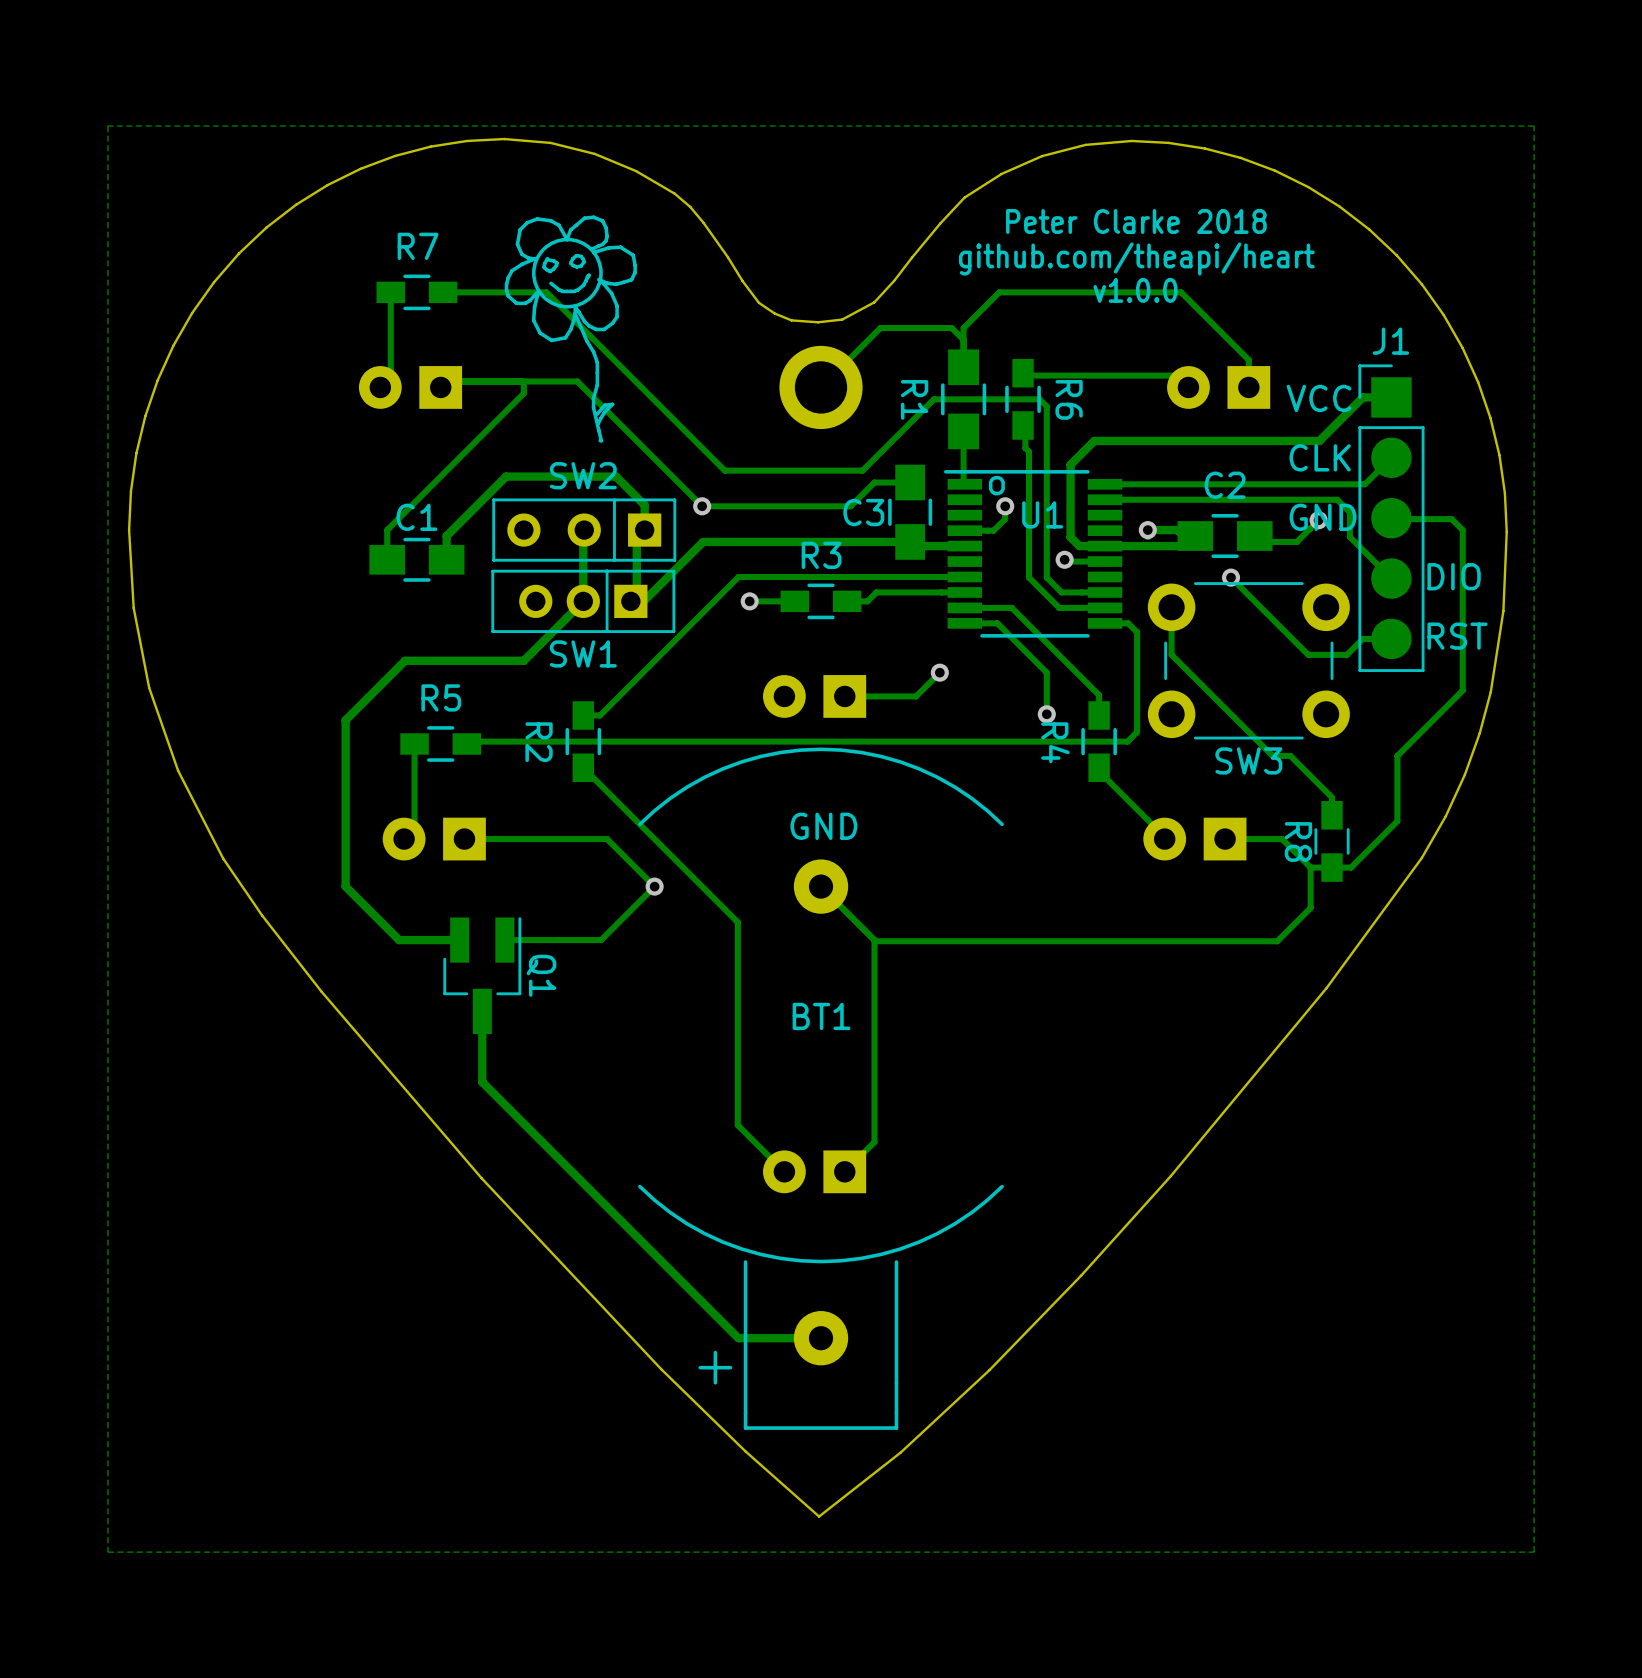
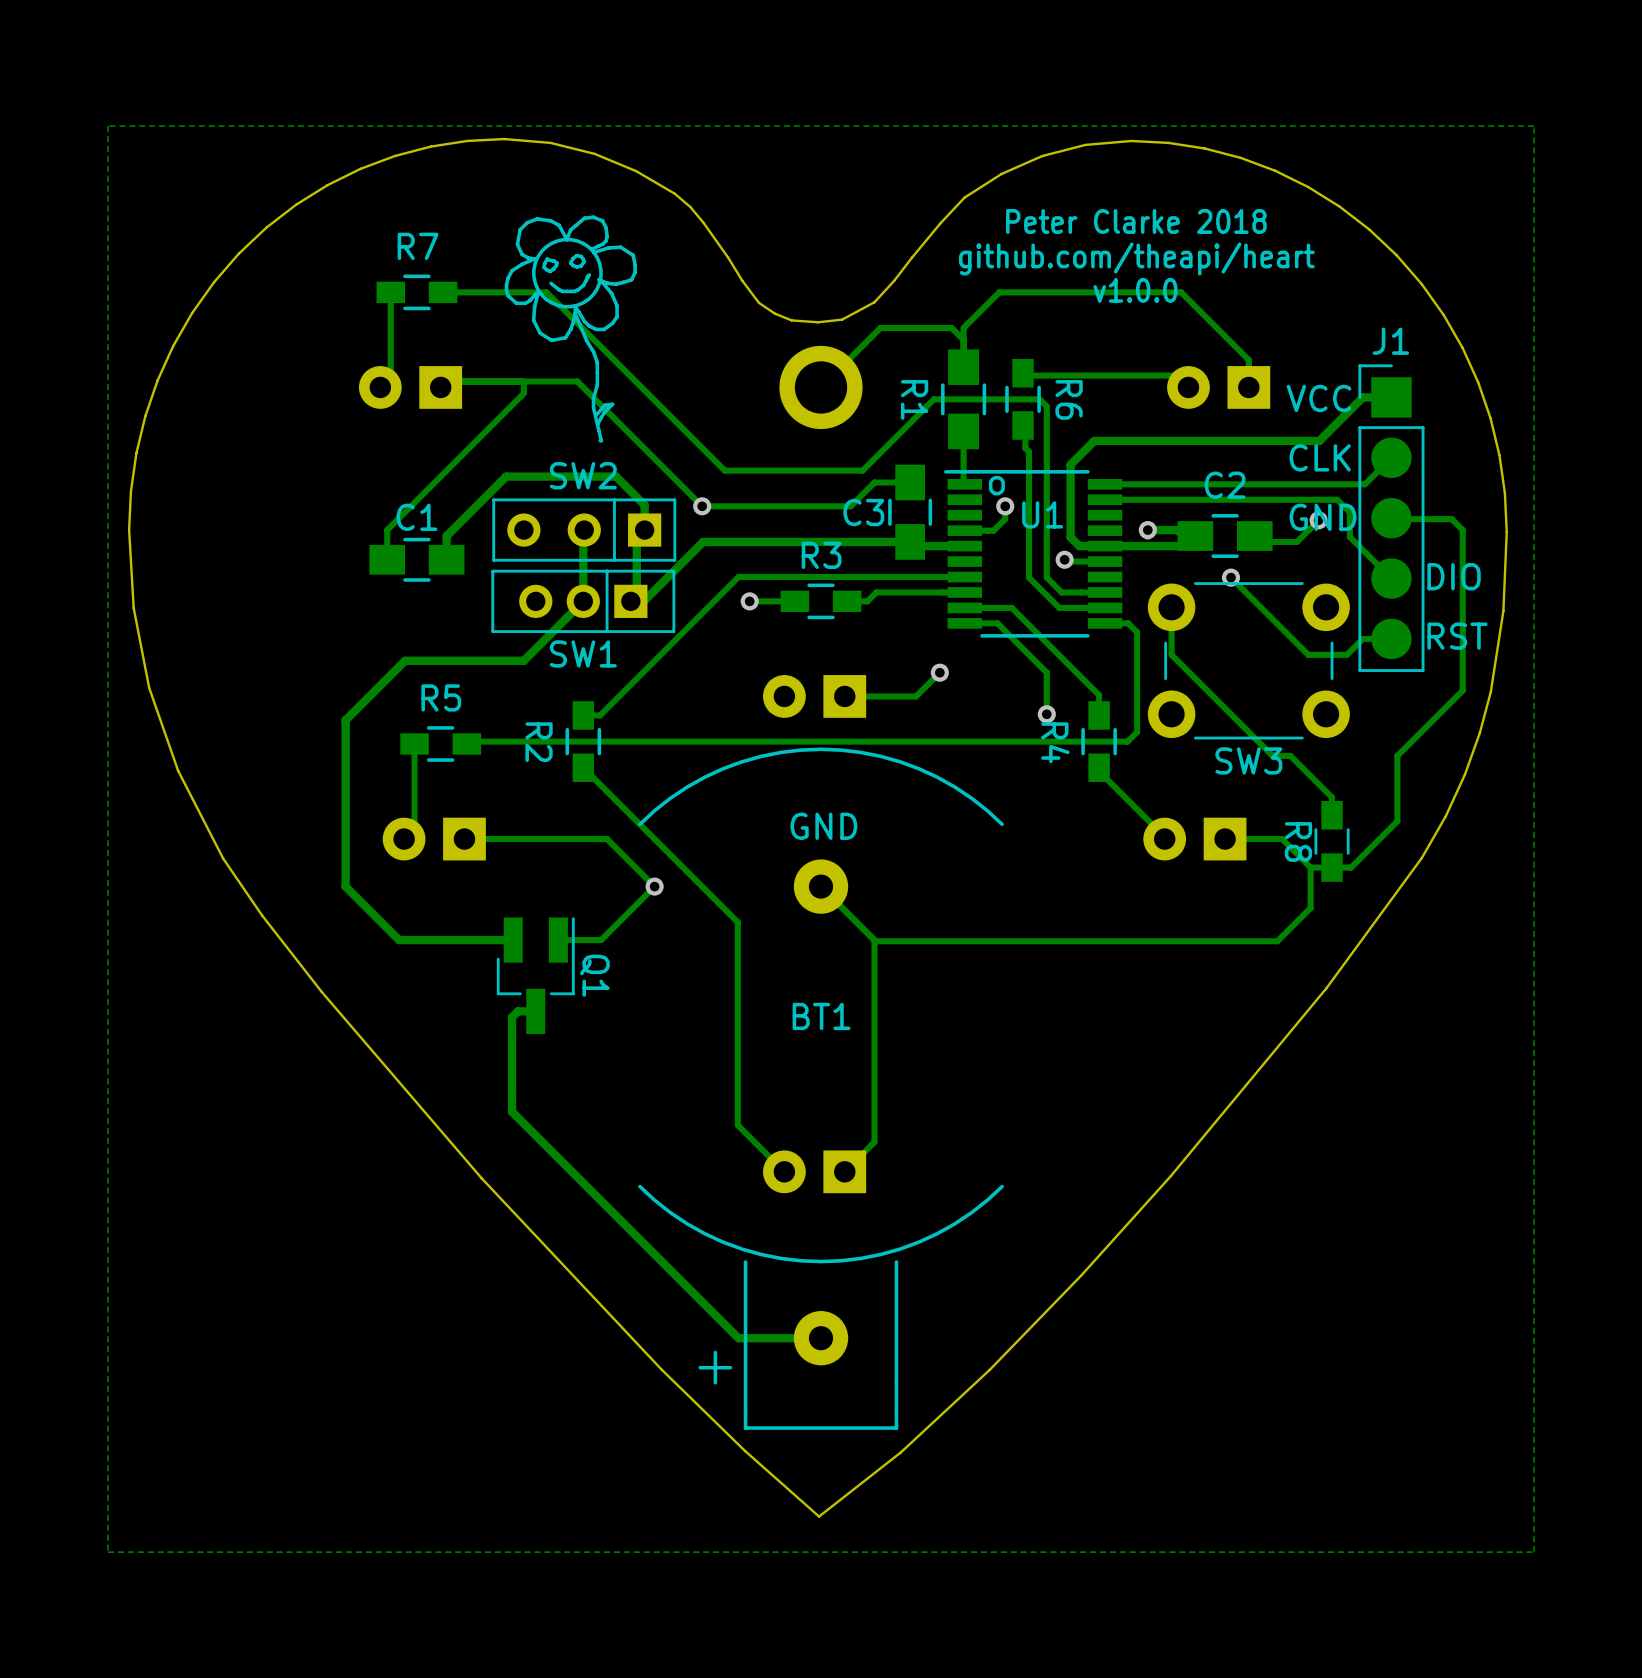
track: (558, 940) (513, 940) -> (504, 940) (459, 940)
Q1 position: (482, 975) -> (535, 975)
track: (482, 1011) (482, 1082) (512, 1111) -> (535, 1011) (517, 1011) (512, 1017) (512, 1111)

